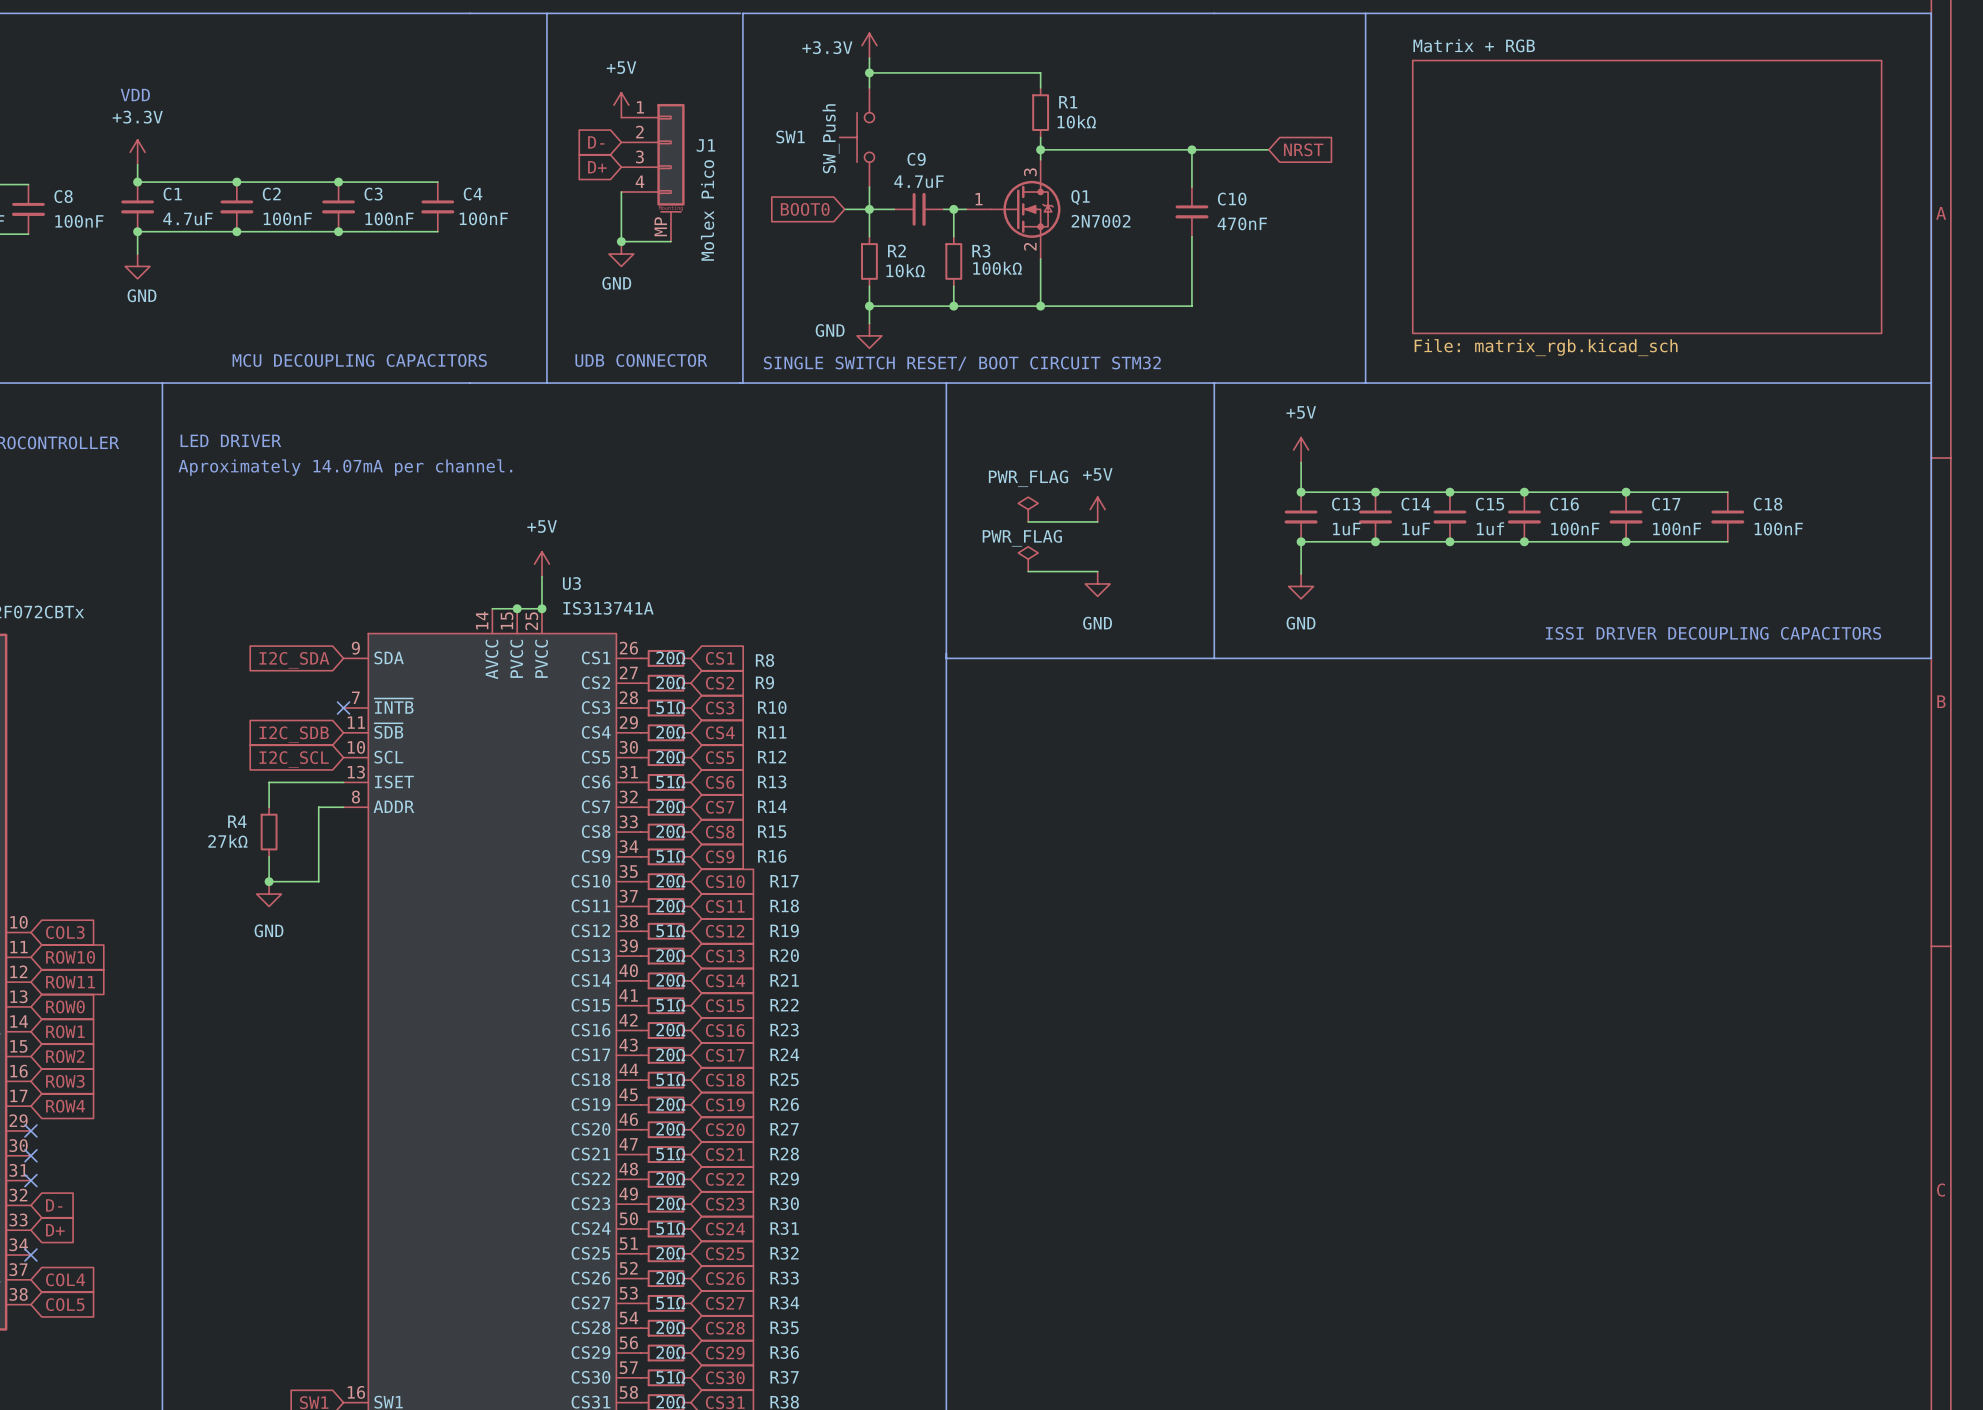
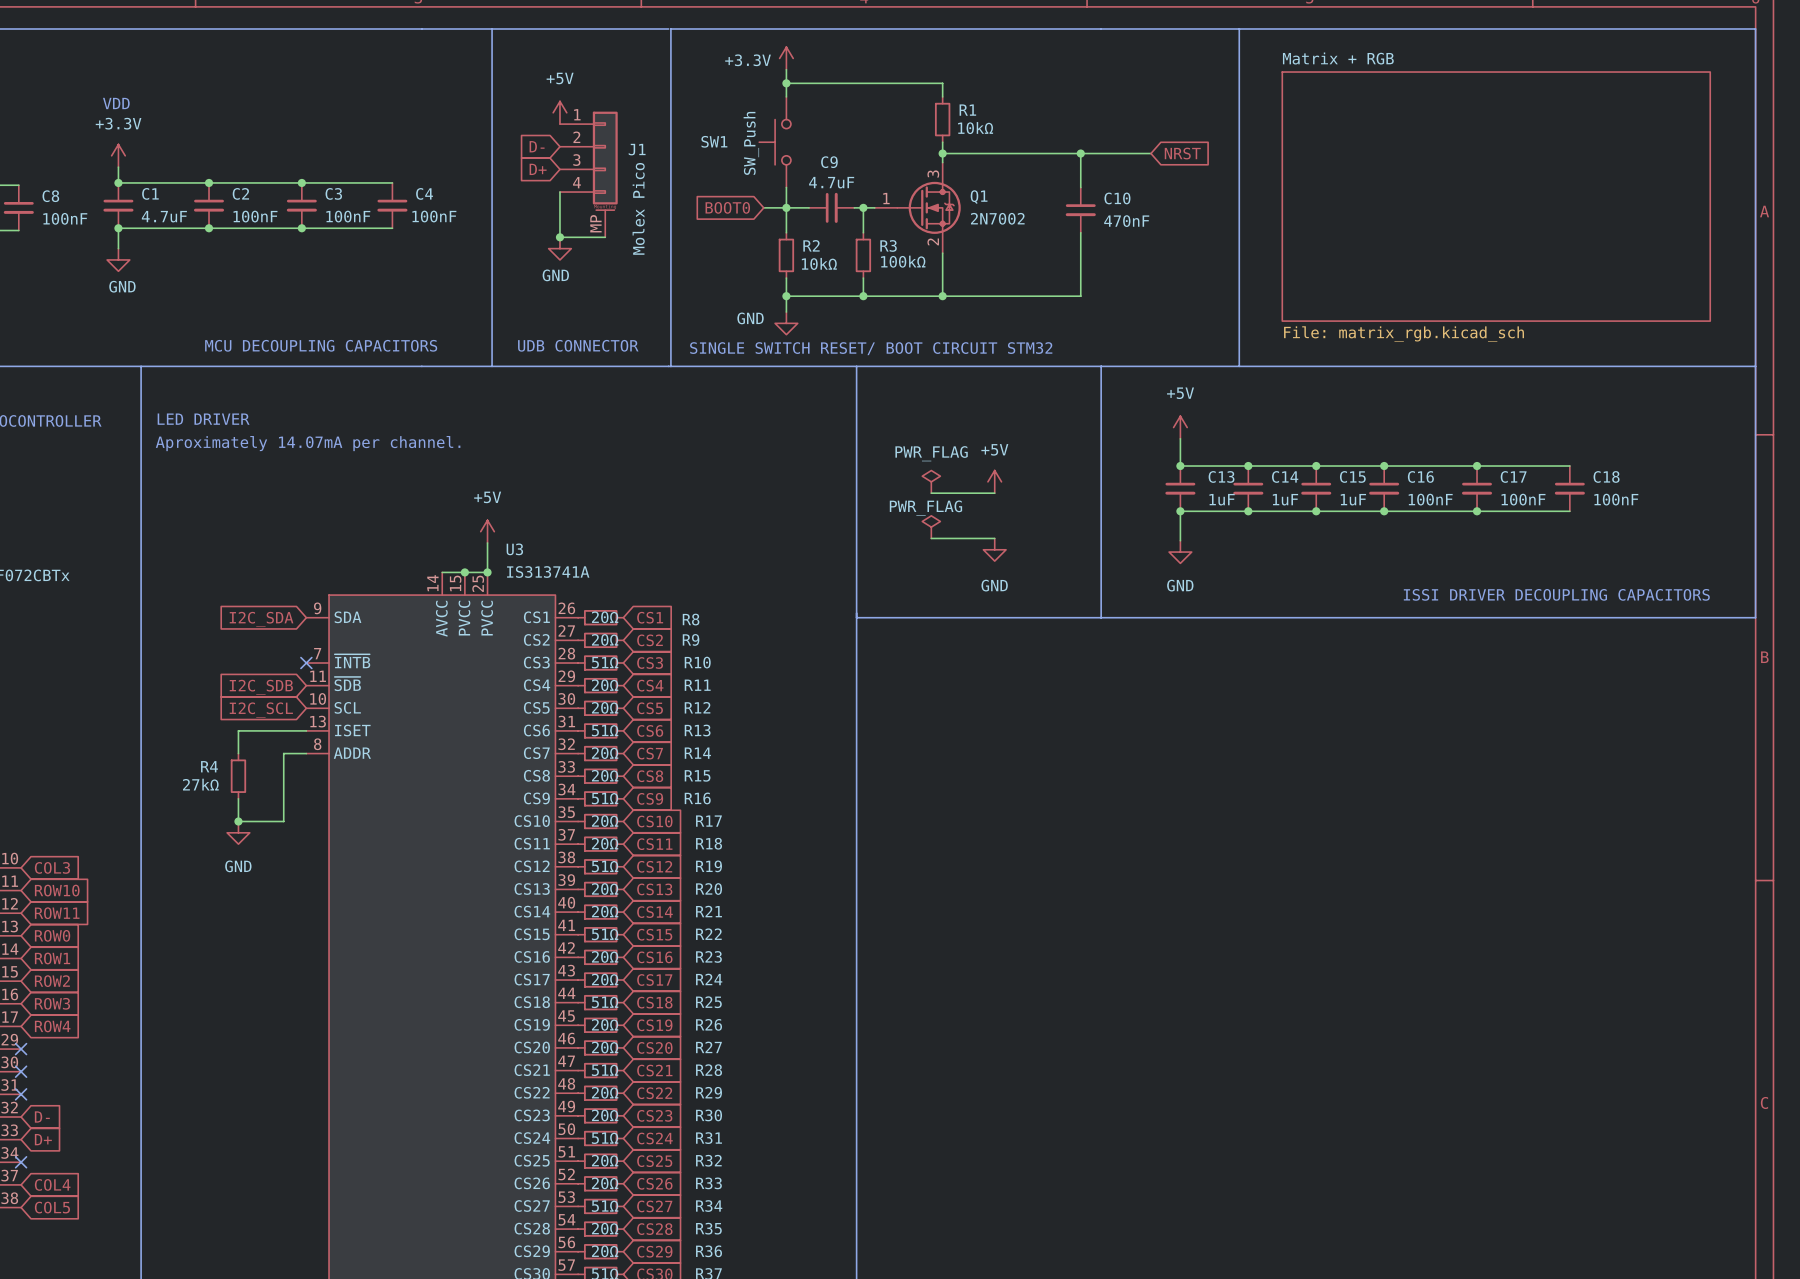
C15 value: 1uf (1490, 528) -> 1uF (1353, 499)

